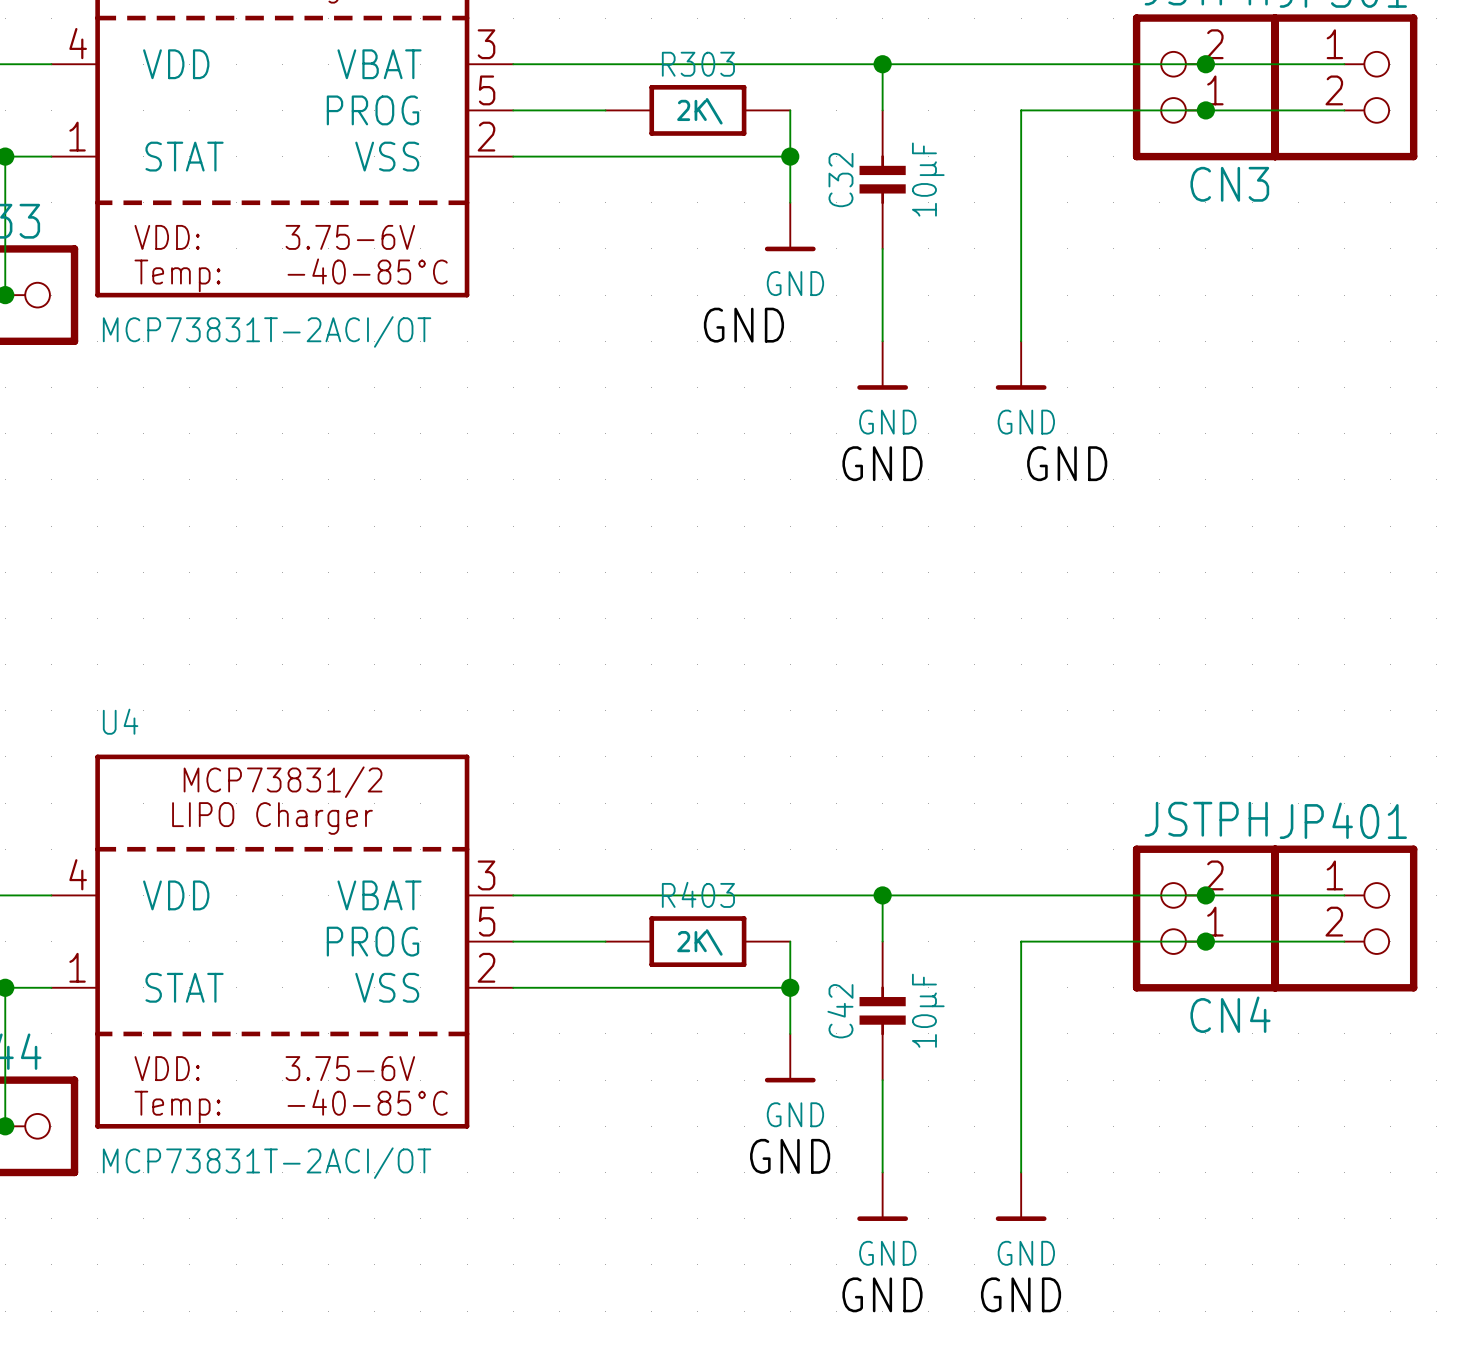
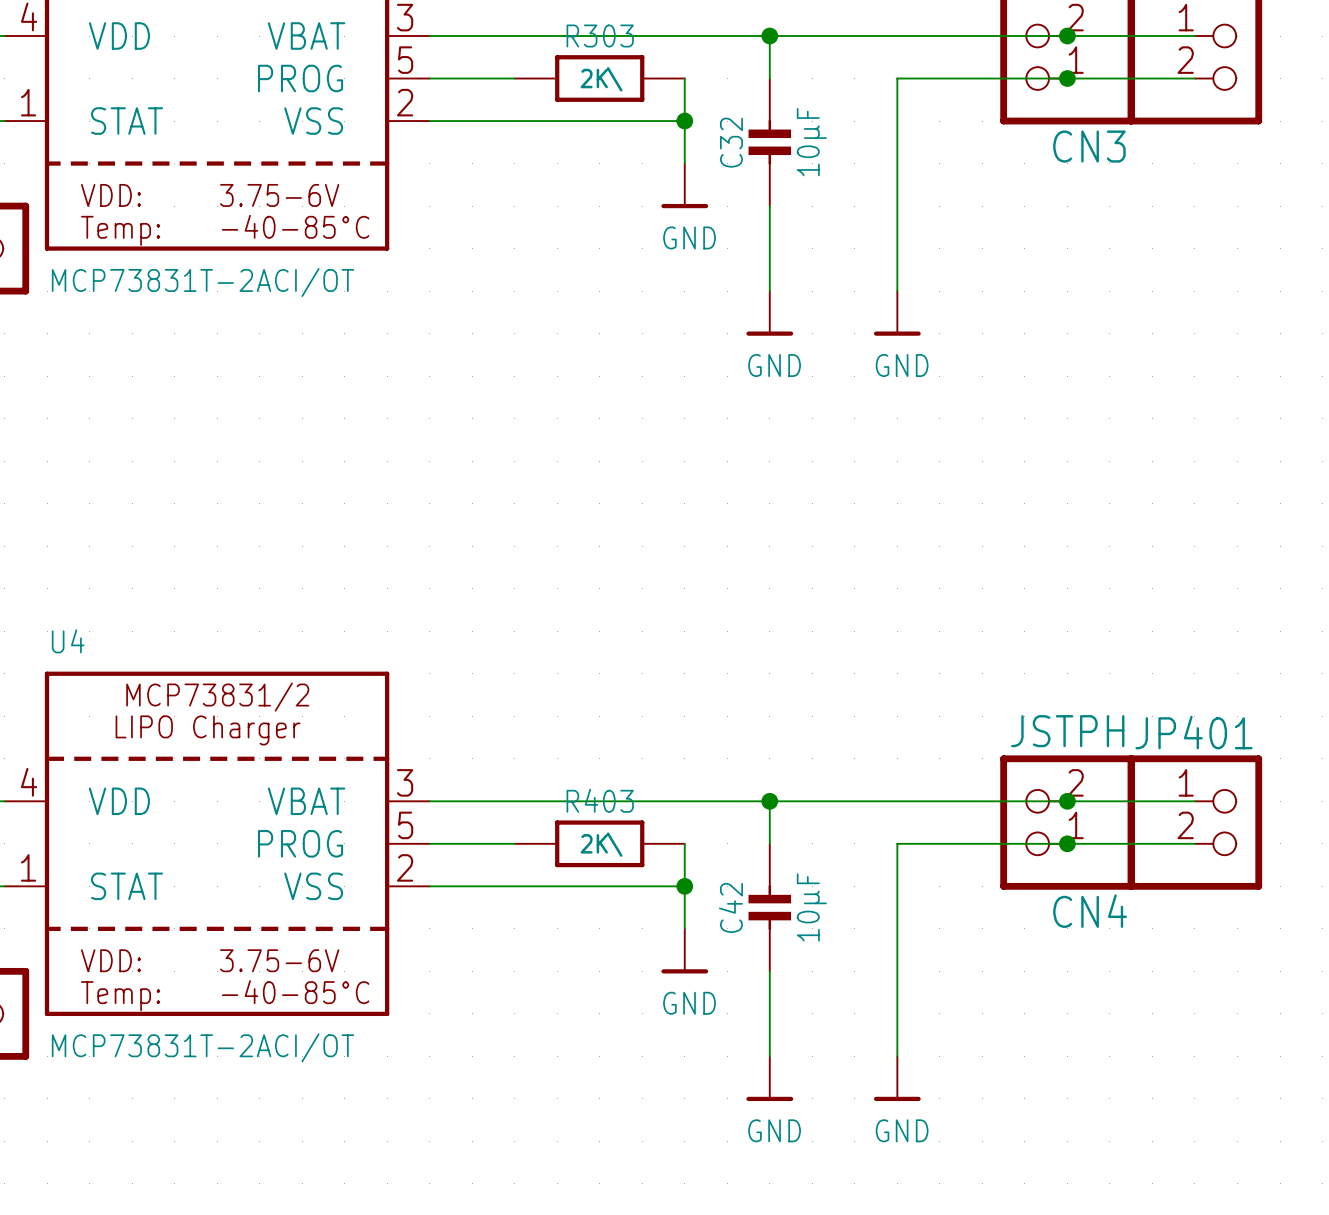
label: GND (743, 325) -> none
label: GND (882, 463) -> none
label: GND (1067, 463) -> none
label: GND (790, 1156) -> none
label: GND (882, 1294) -> none
label: GND (1021, 1294) -> none

